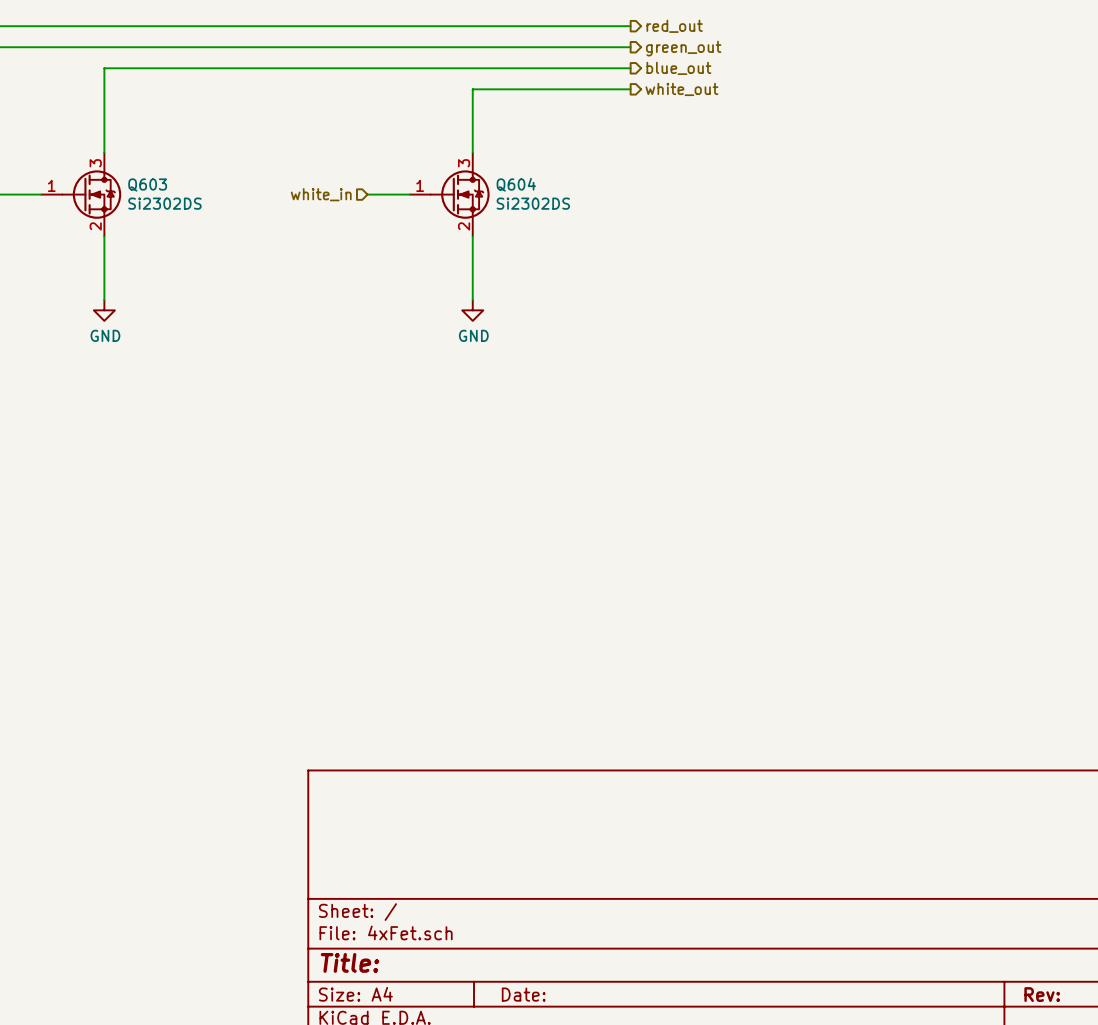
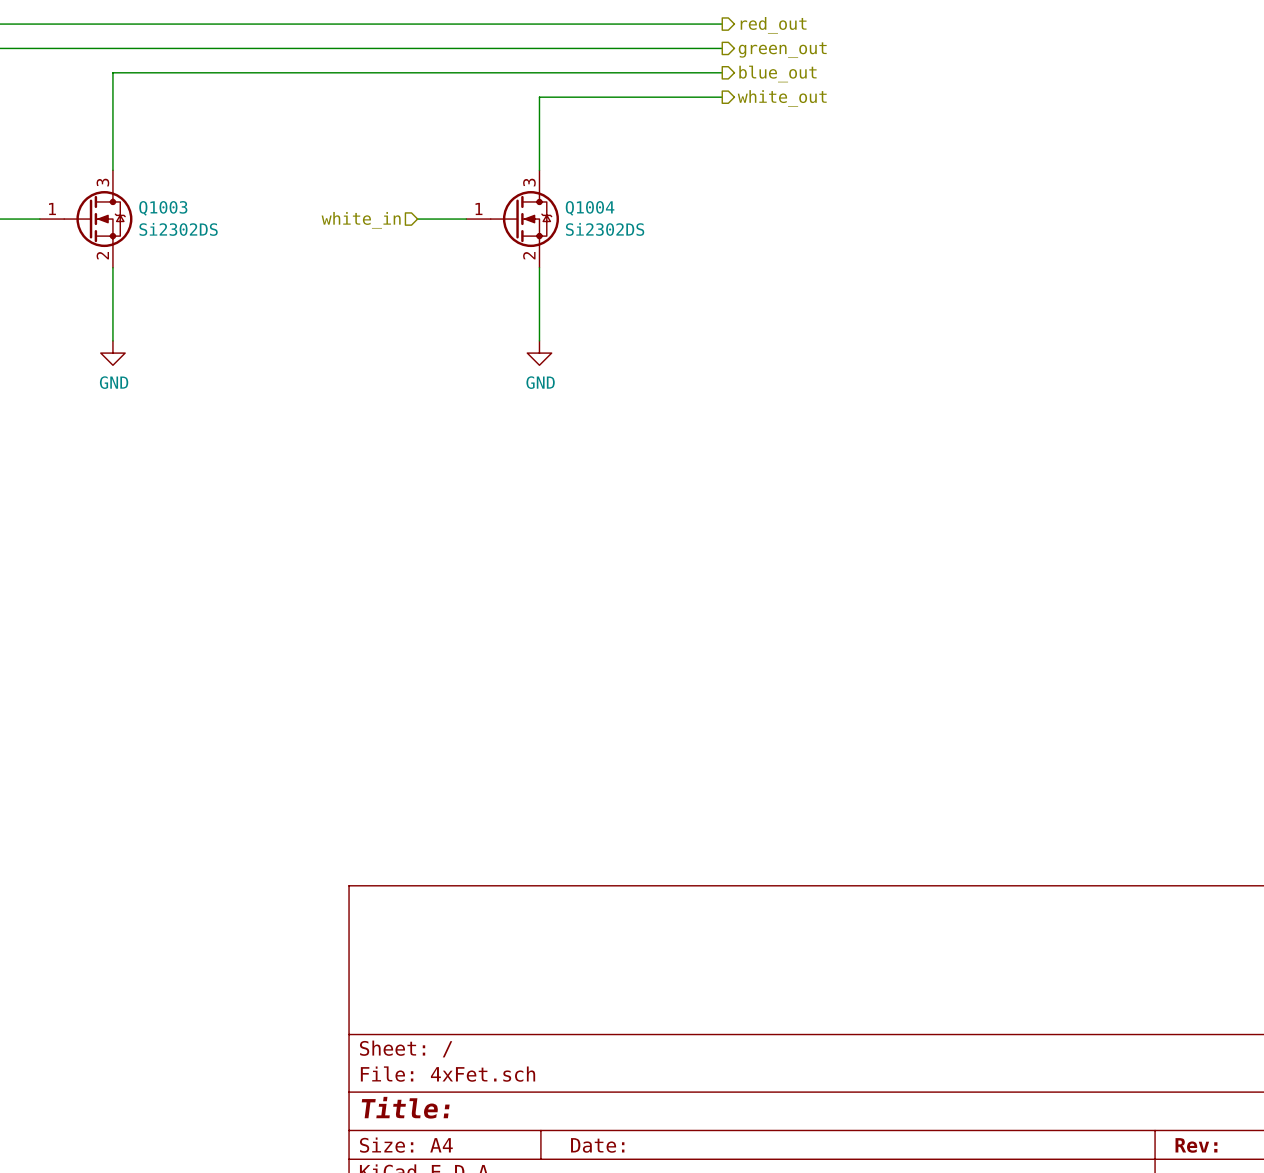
Q604 name: Q604 (516, 184) -> Q1004 (590, 208)
Q603 name: Q603 (147, 185) -> Q1003 (163, 208)

